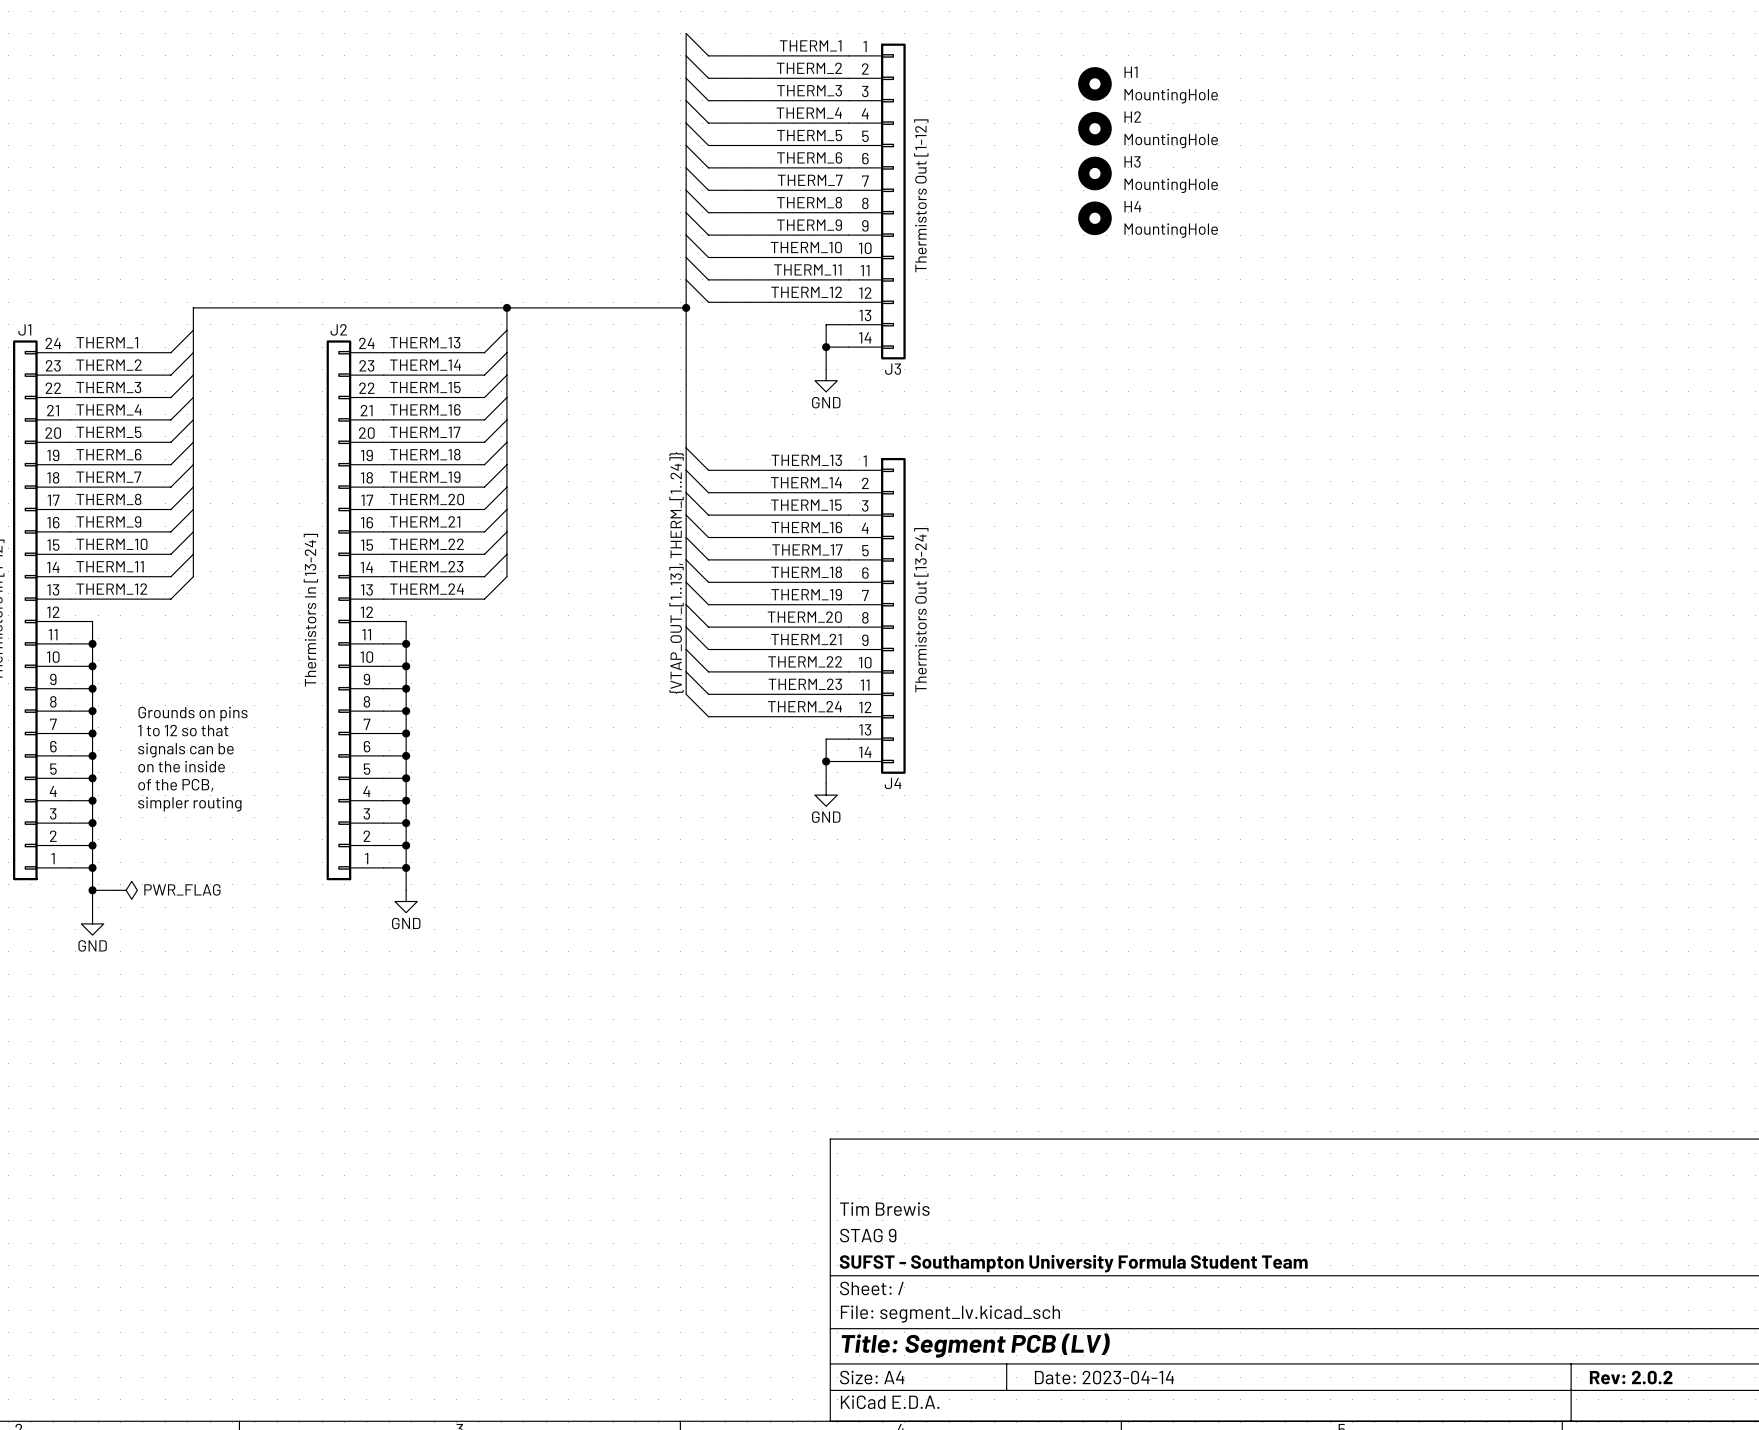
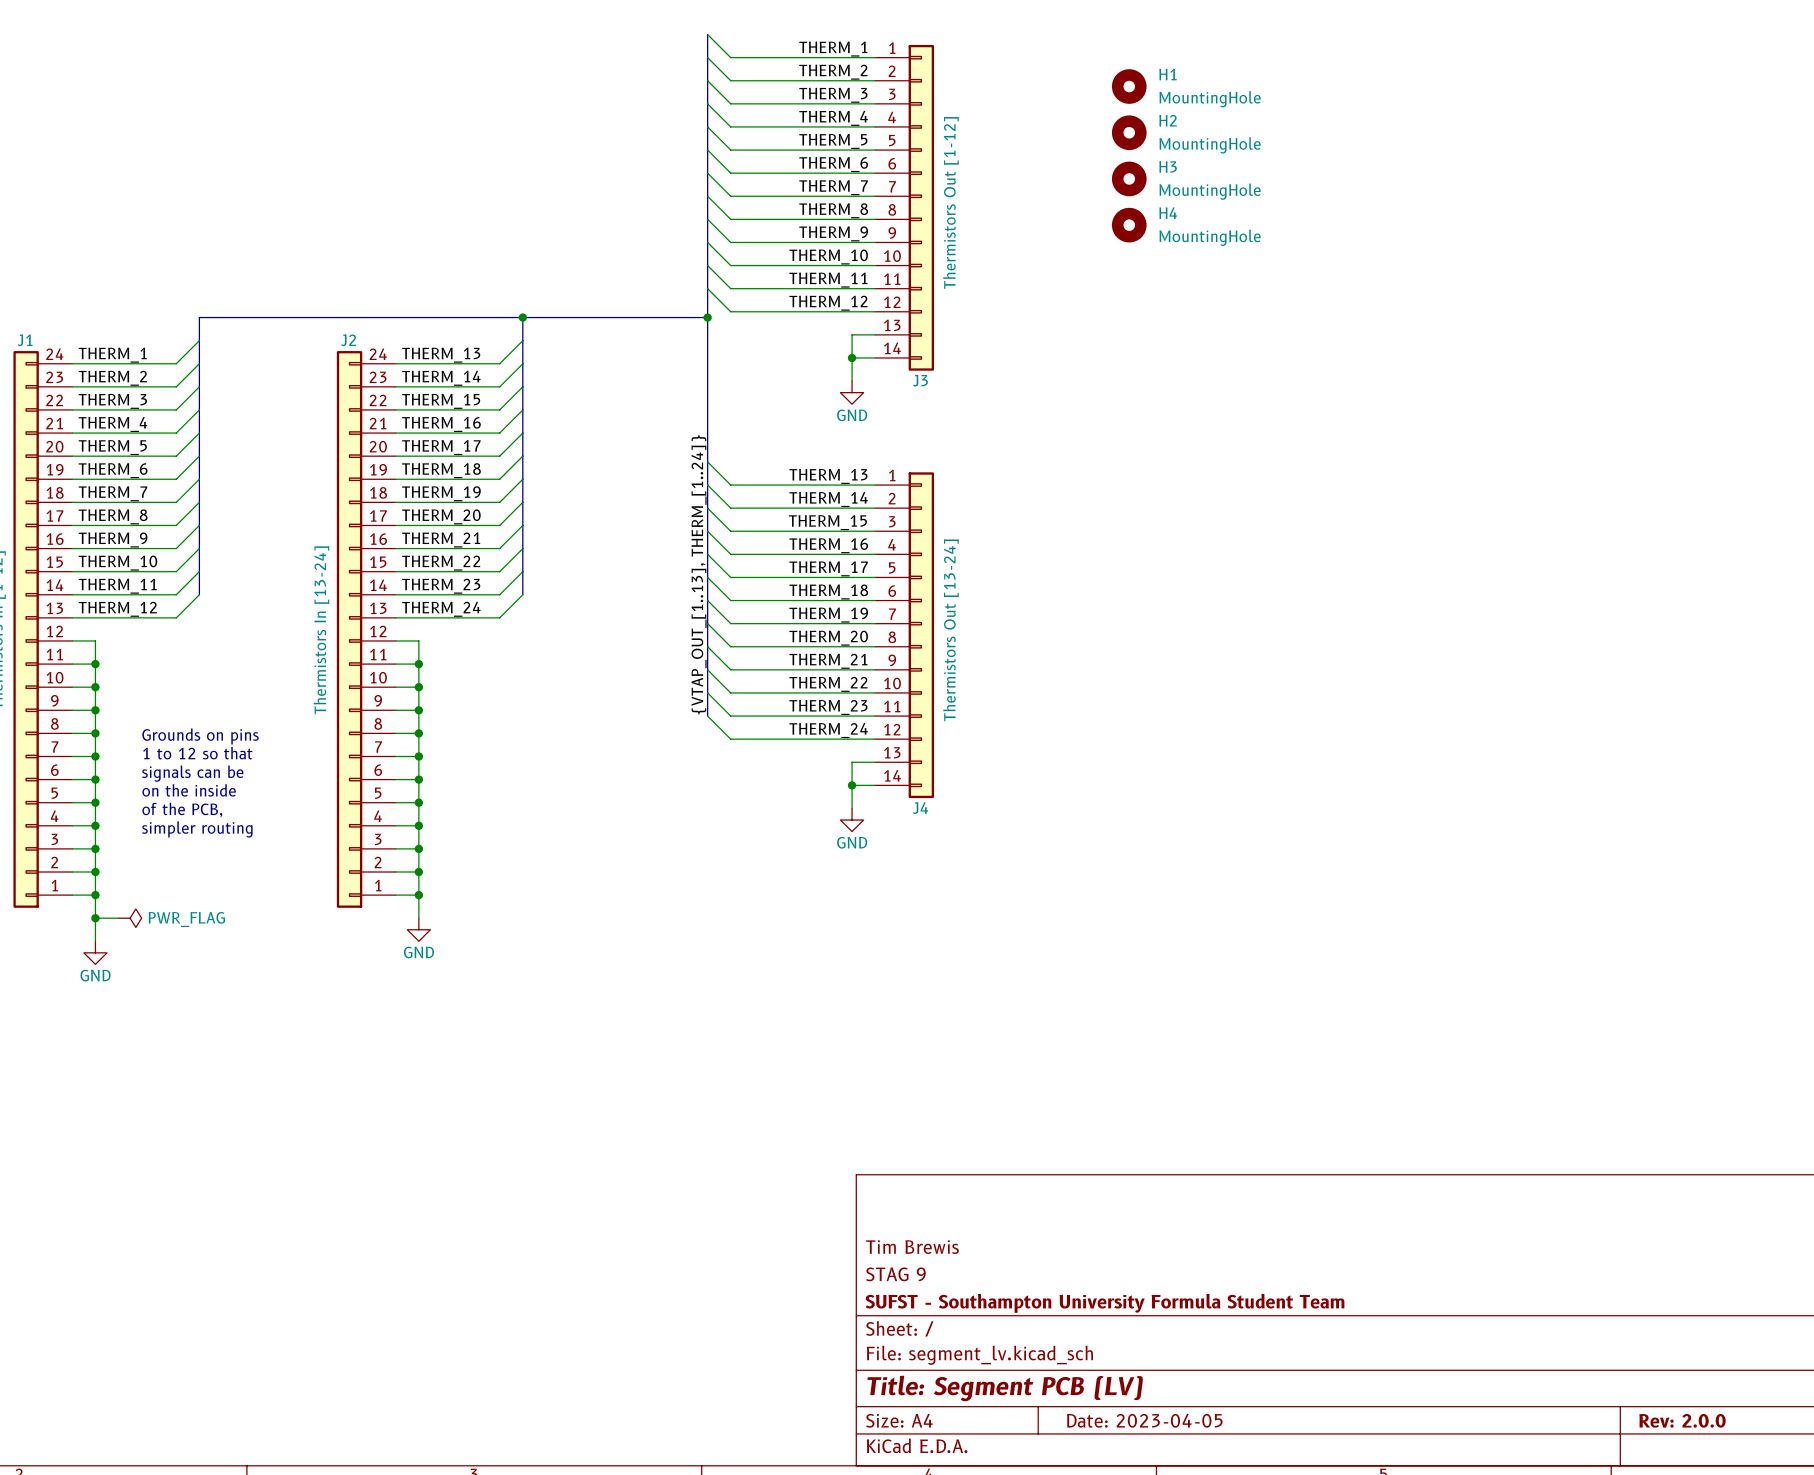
title block: Date: 2023-04-14 (1104, 1377) -> Date: 2023-04-05 (1144, 1420)
title block: Rev: 2.0.2 (1631, 1377) -> Rev: 2.0.0 (1682, 1420)

